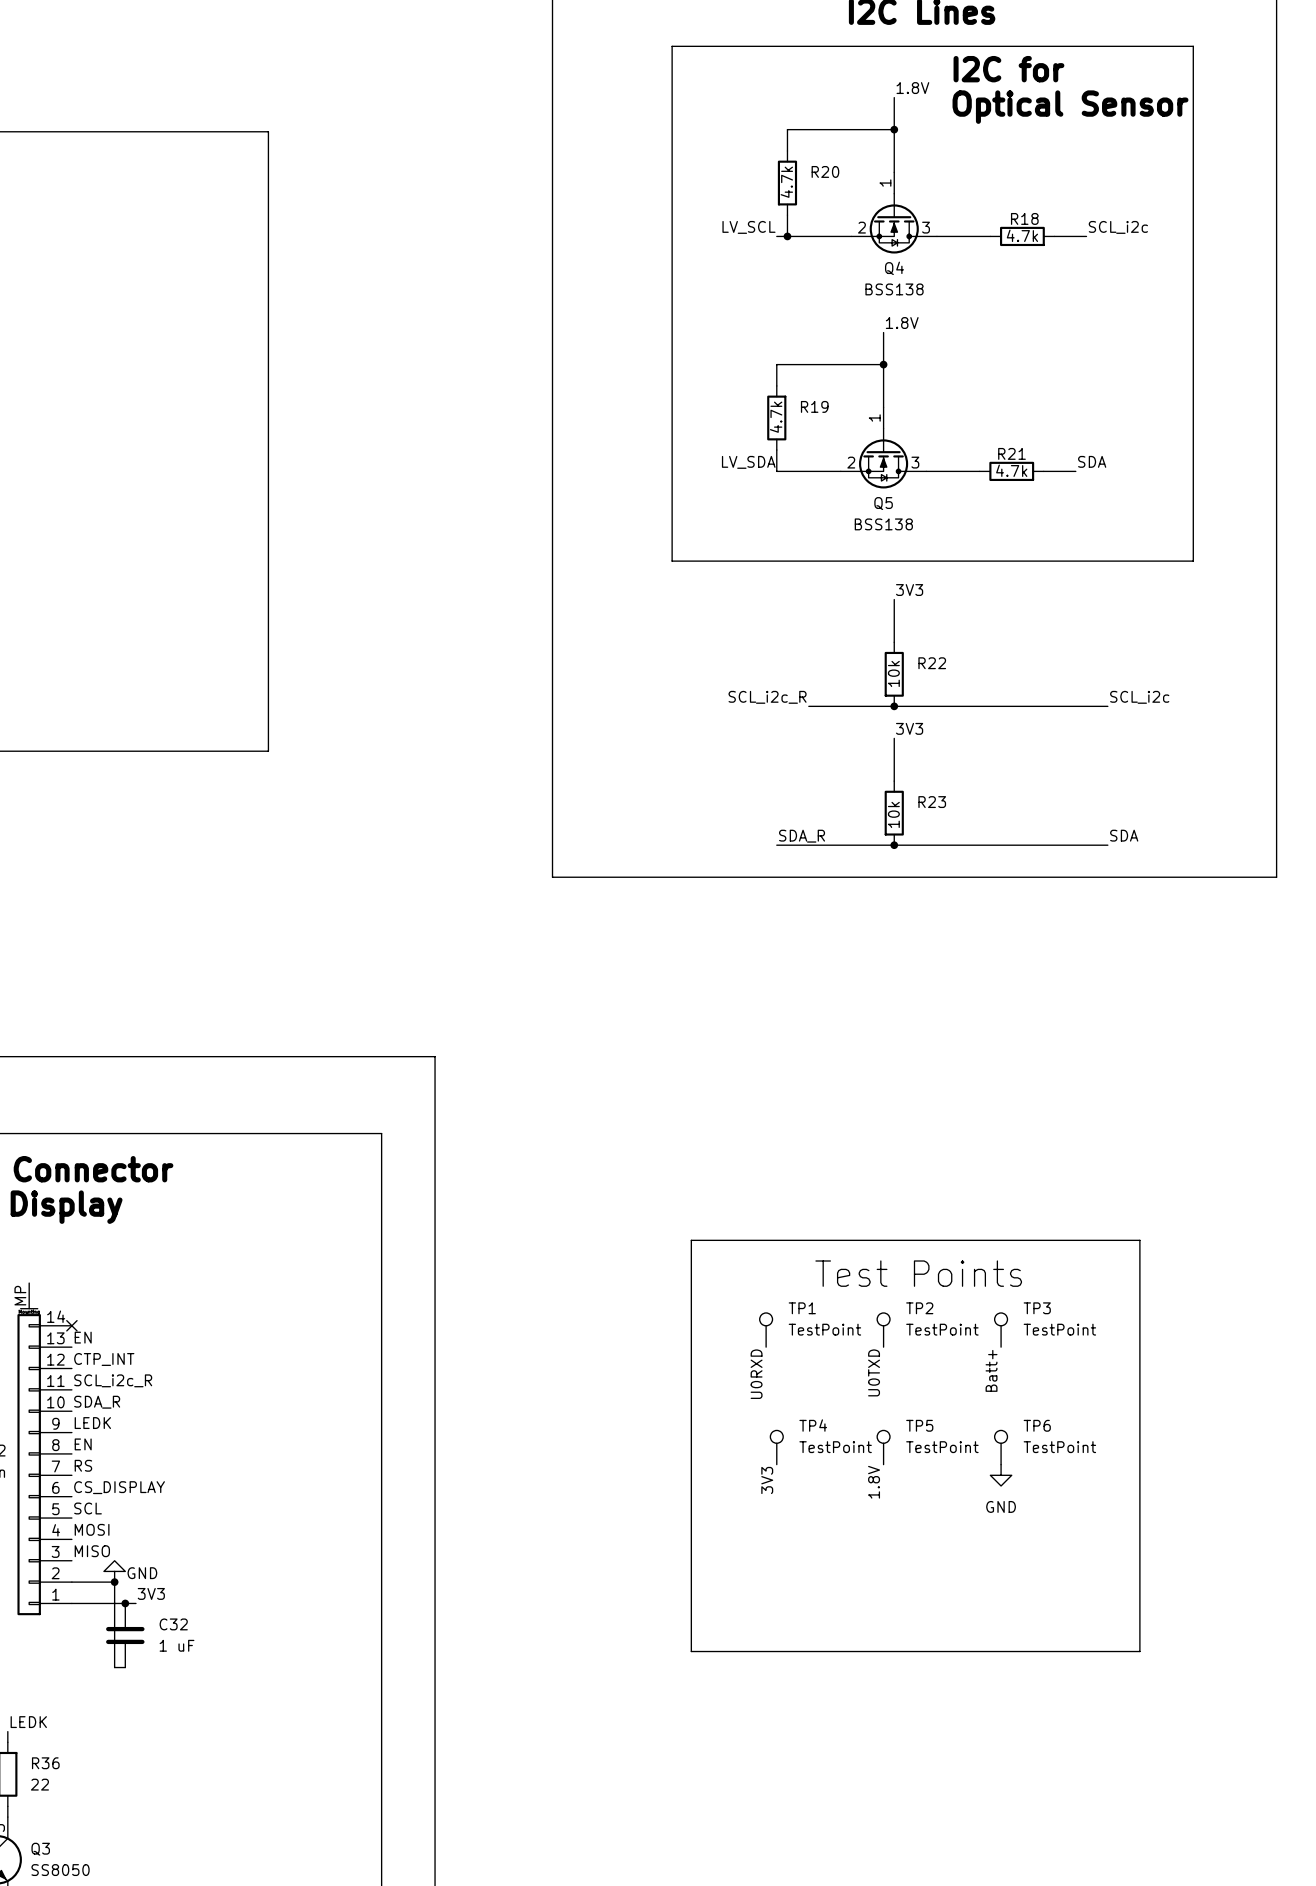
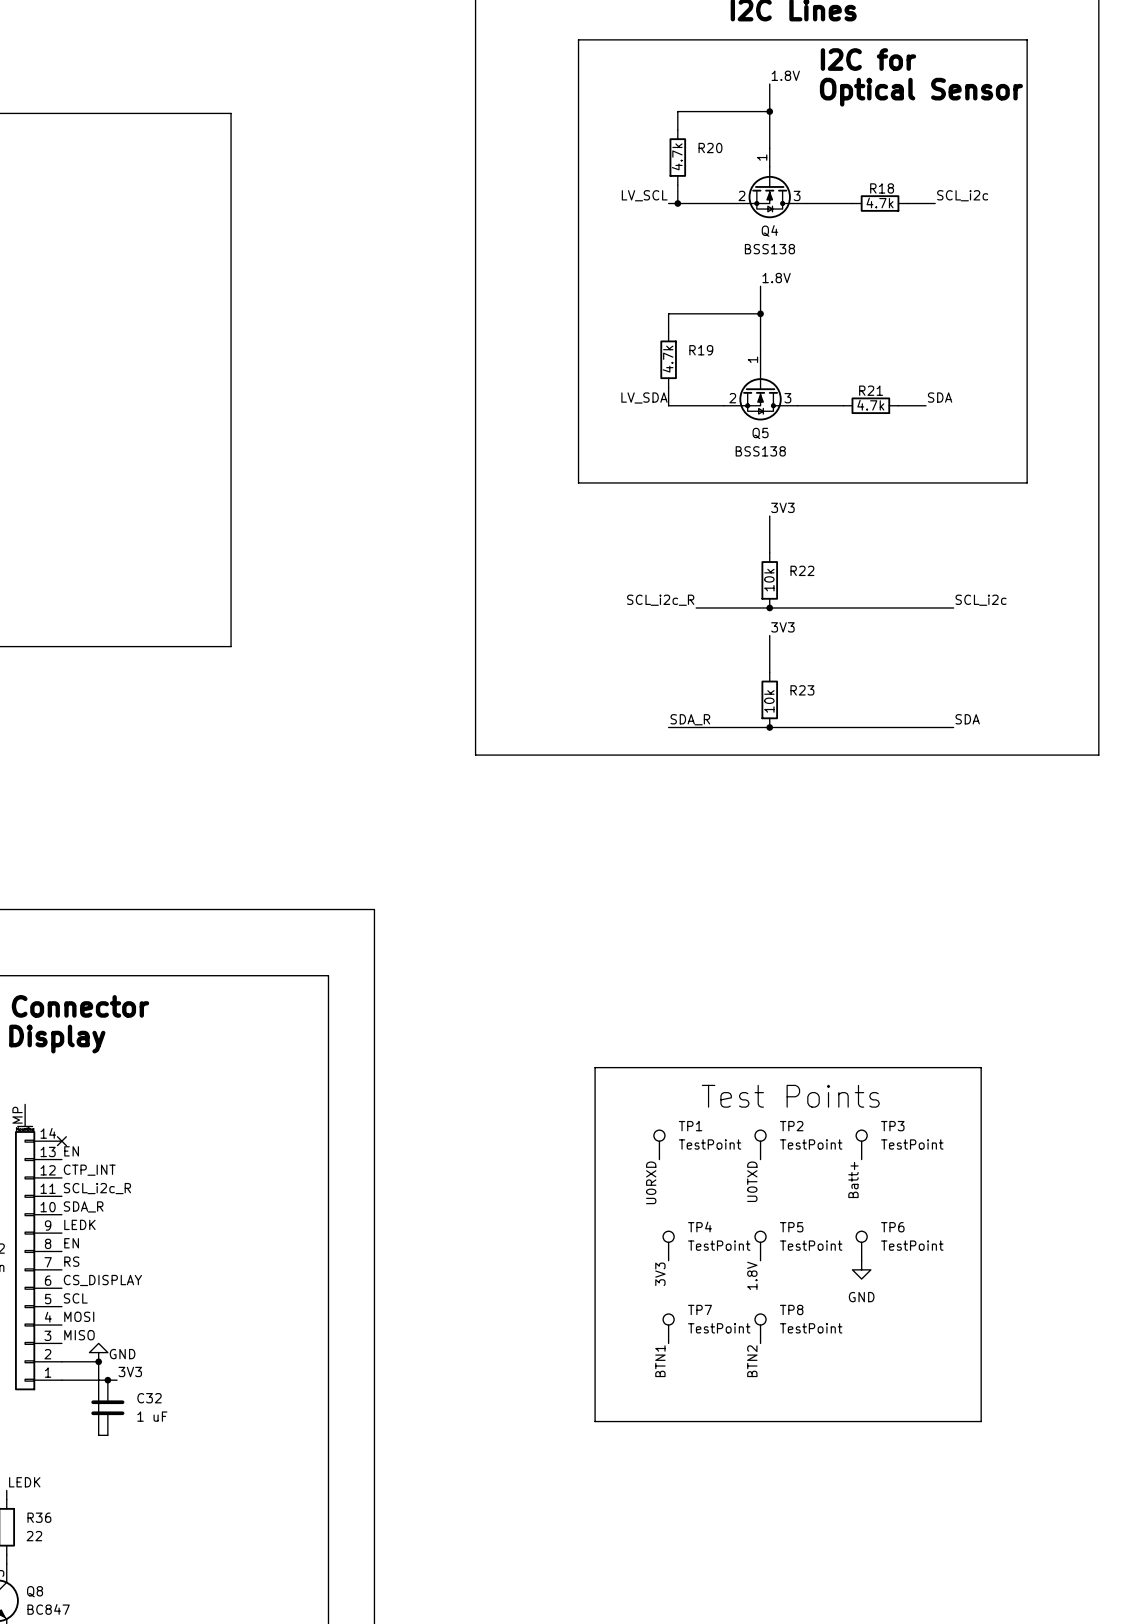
TP7: none -> TestPoint (668, 1328)
TP8: none -> TestPoint (760, 1328)
label: none -> BTN1 (660, 1361)
label: none -> BTN2 (752, 1361)
Q3 name: Q3 (40, 1849) -> Q8 (35, 1591)
Q3 value: SS8050 (60, 1870) -> BC847 (48, 1609)

